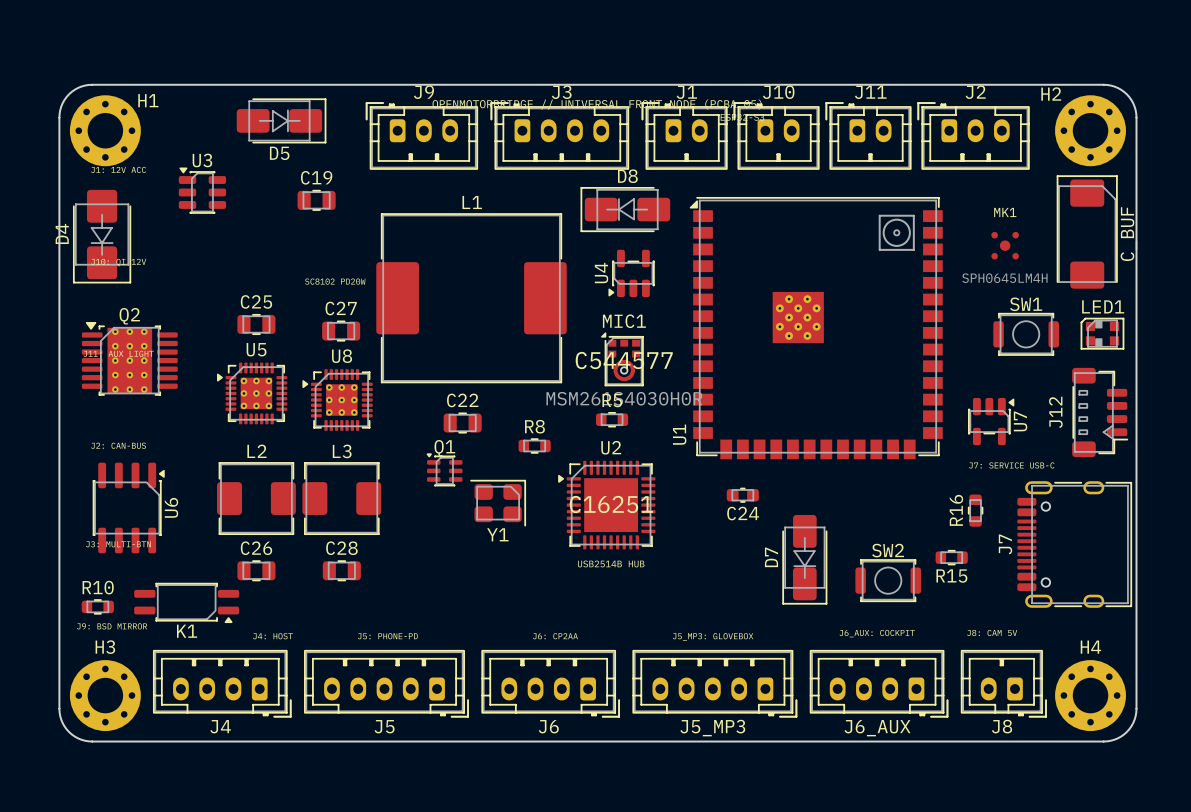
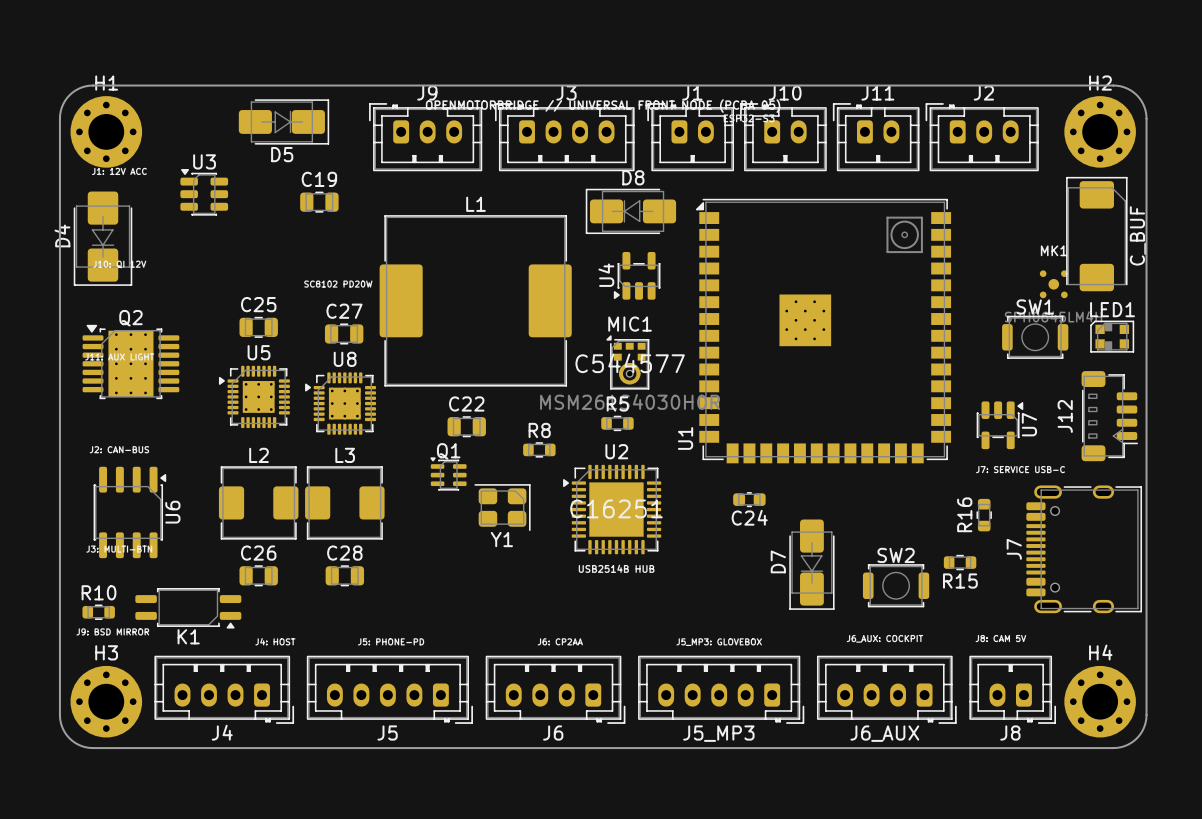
H2 name position: H2 (1051, 94) -> H2 (1100, 83)
H1 name position: H1 (148, 100) -> H1 (106, 83)
MK1 position: (1005, 245) -> (1053, 284)

